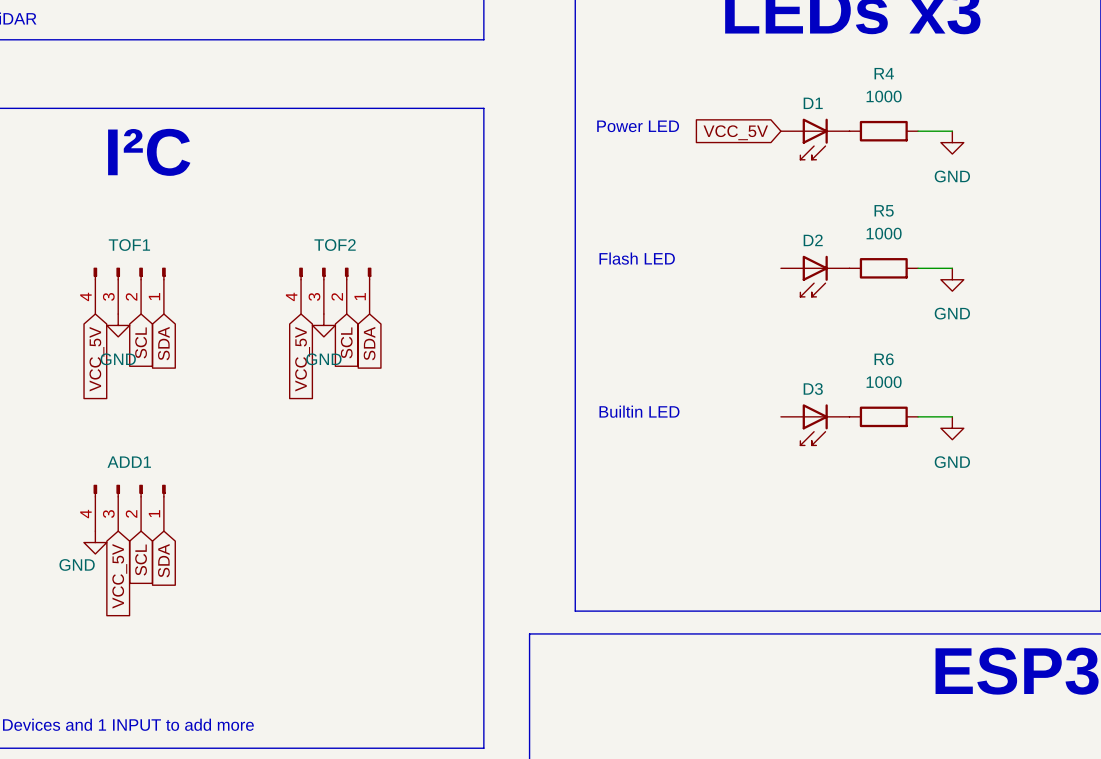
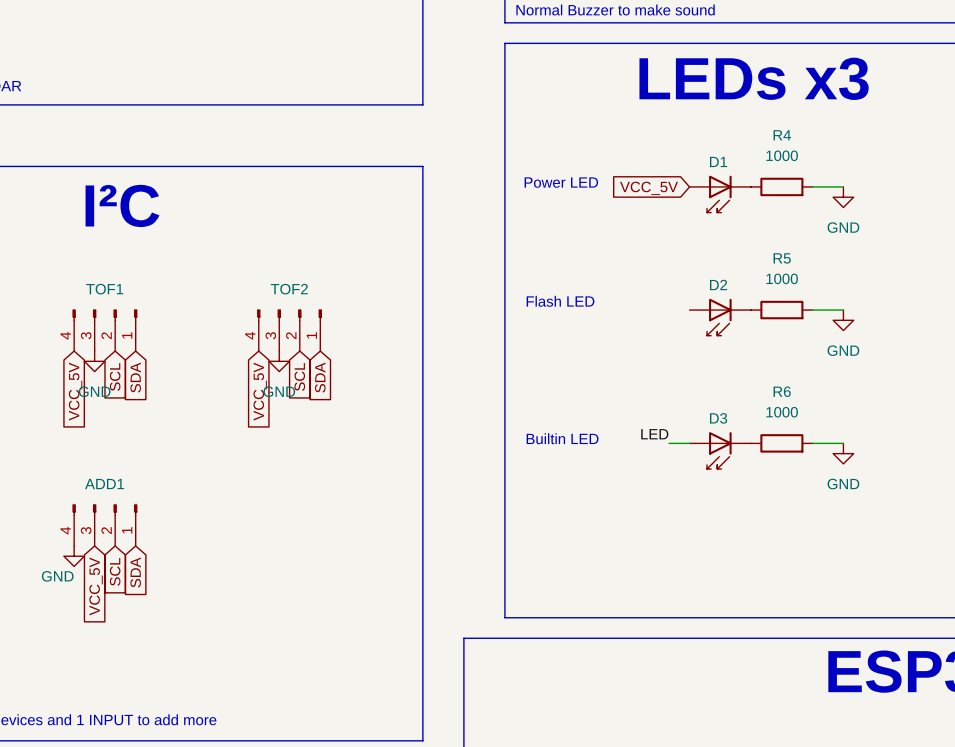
label: none -> LED (654, 434)
wire: none -> (669, 443) (689, 443)

